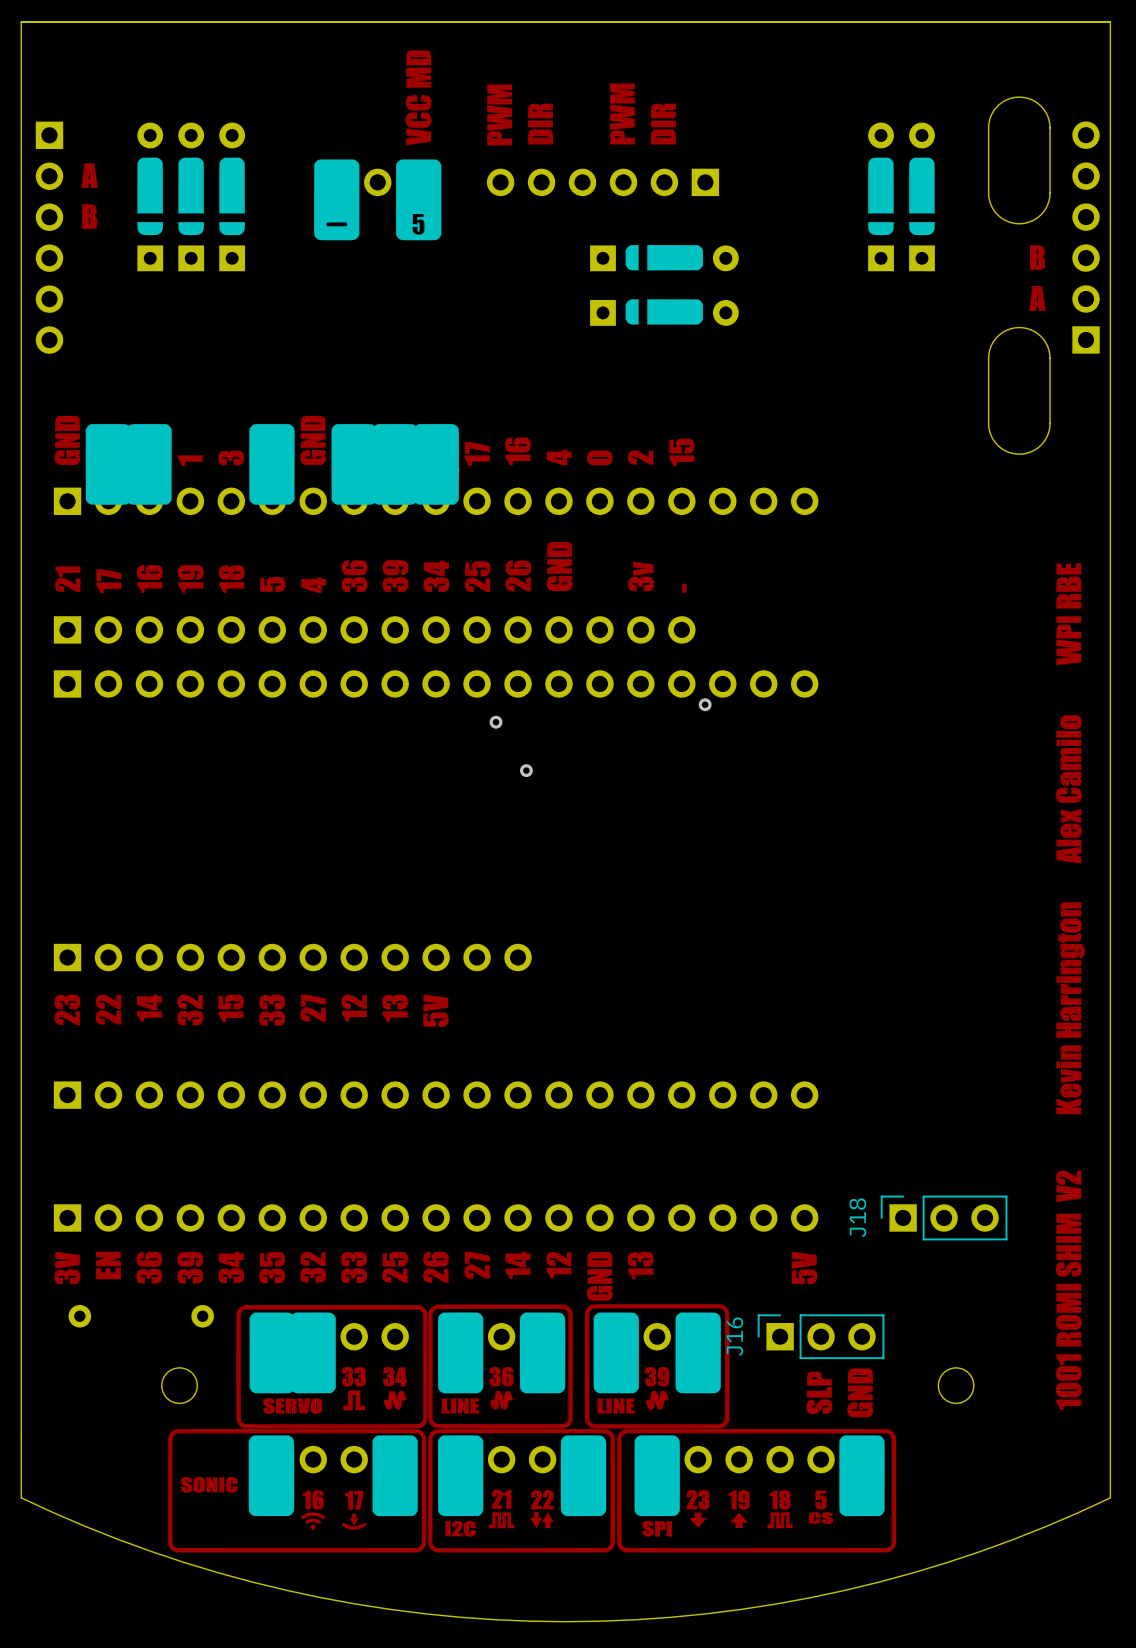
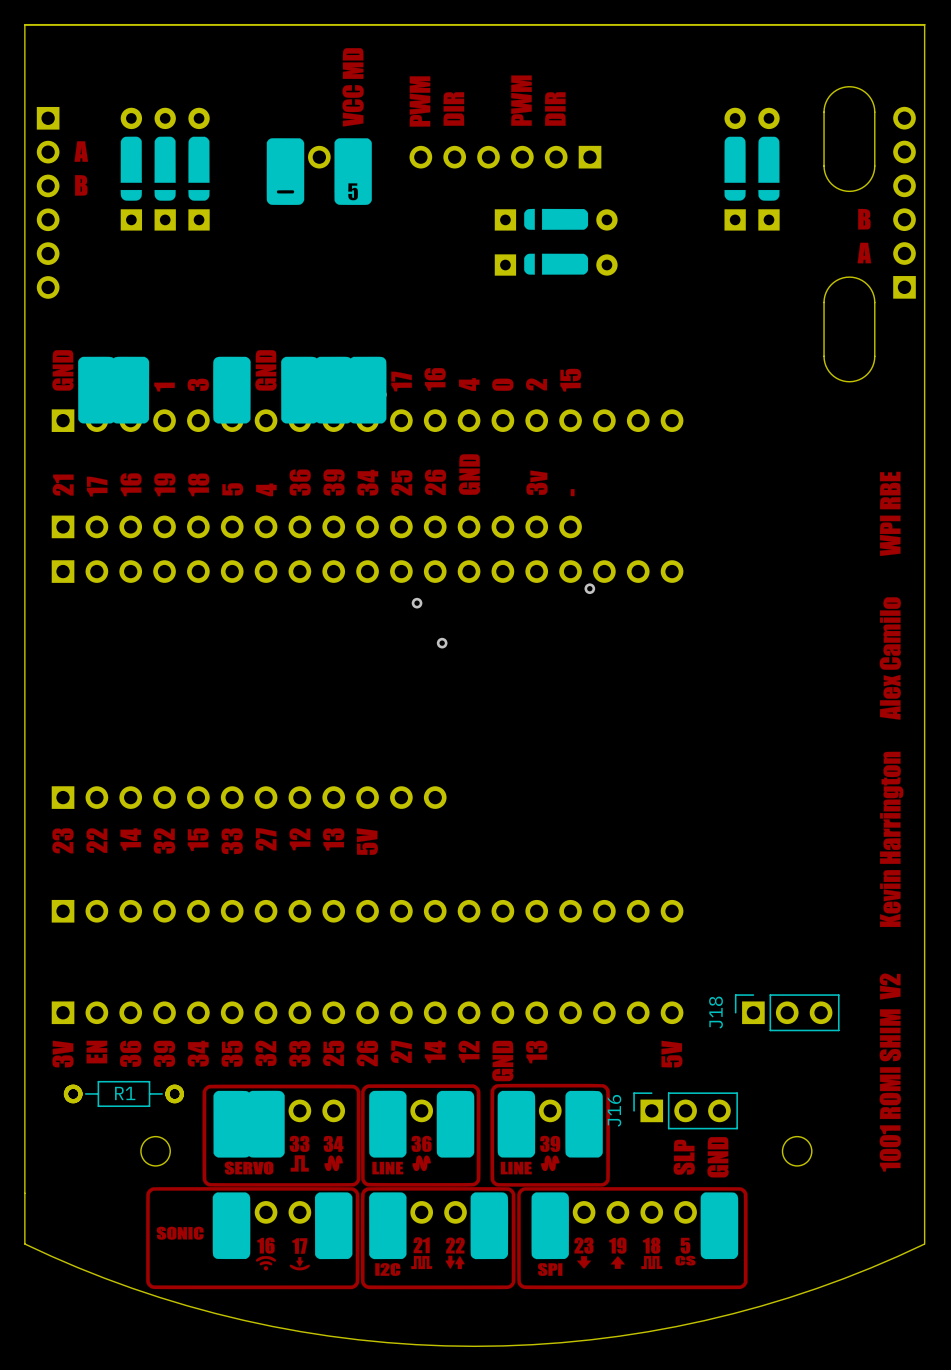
R1: none -> (123, 1093)

